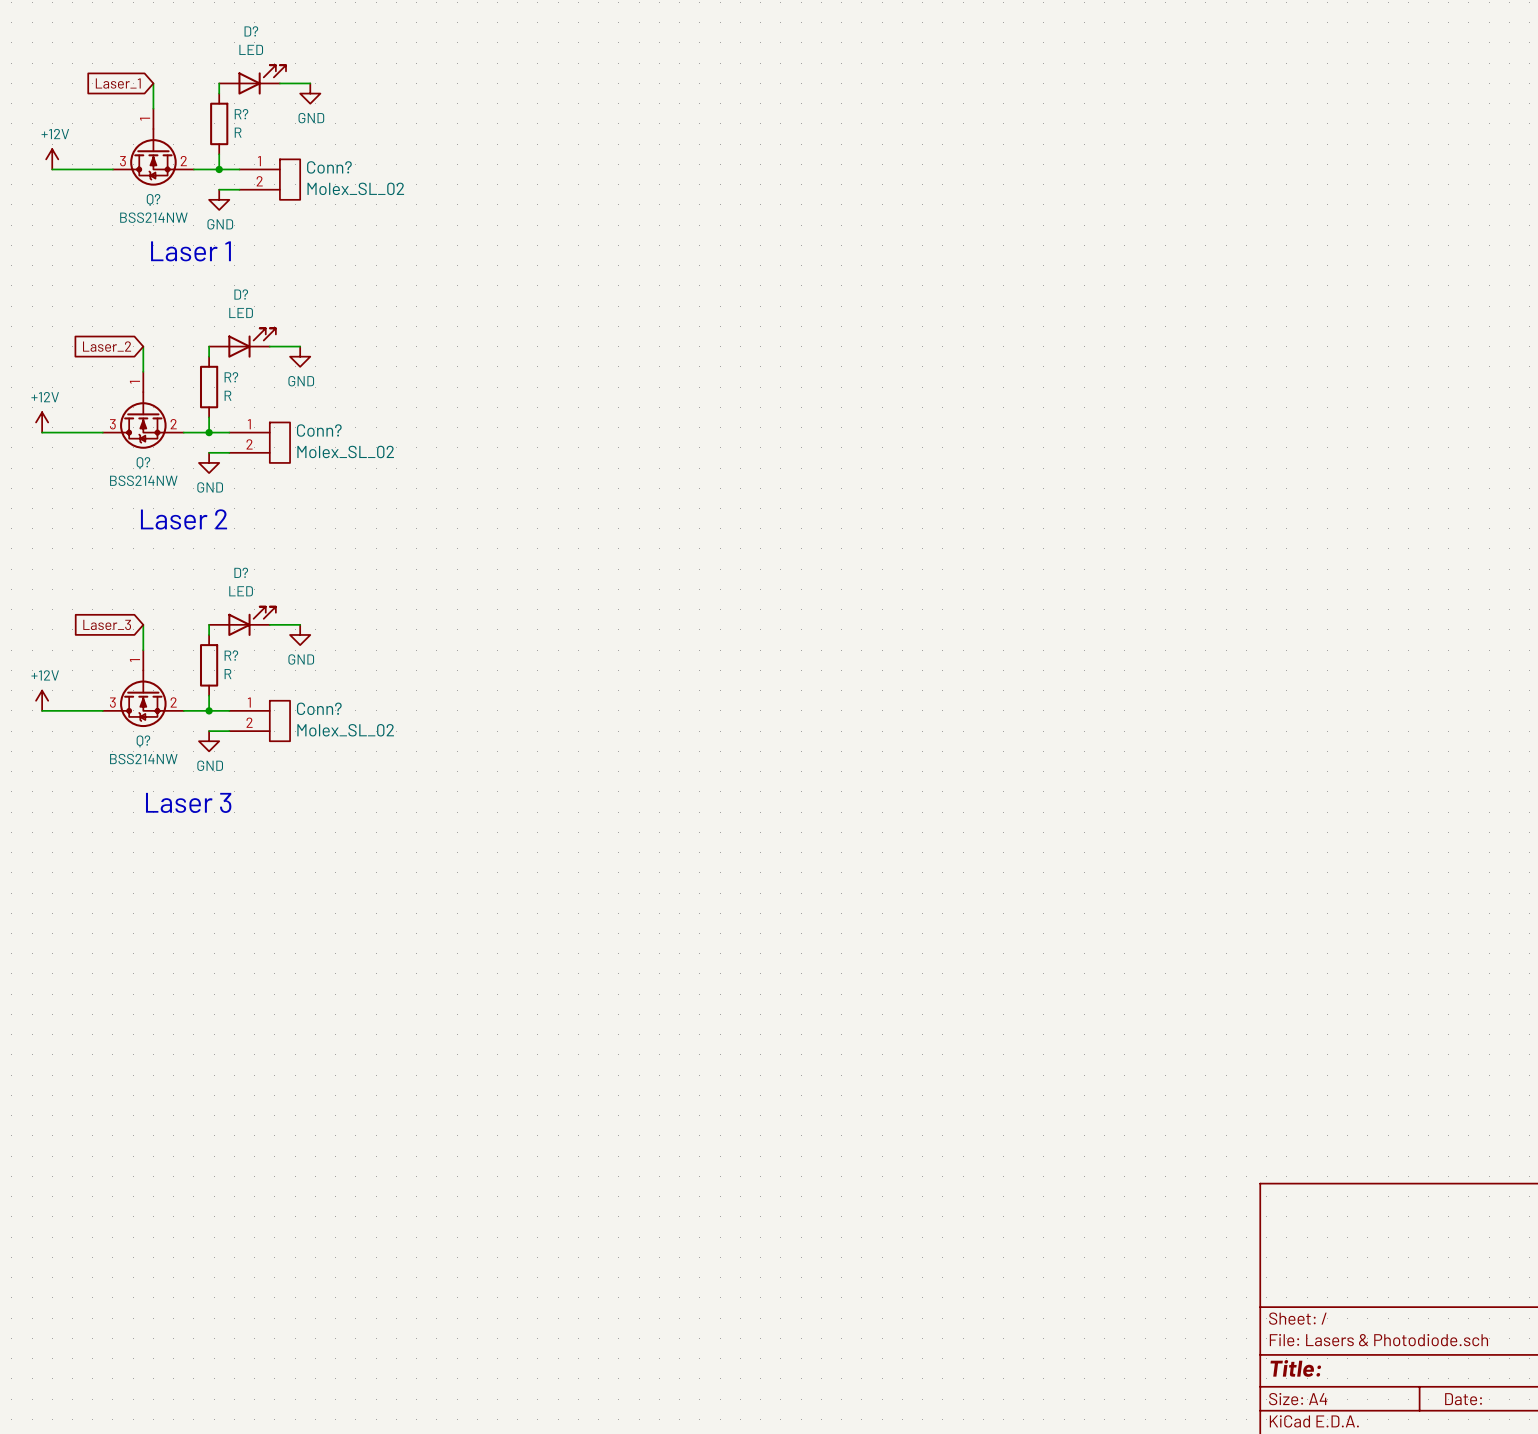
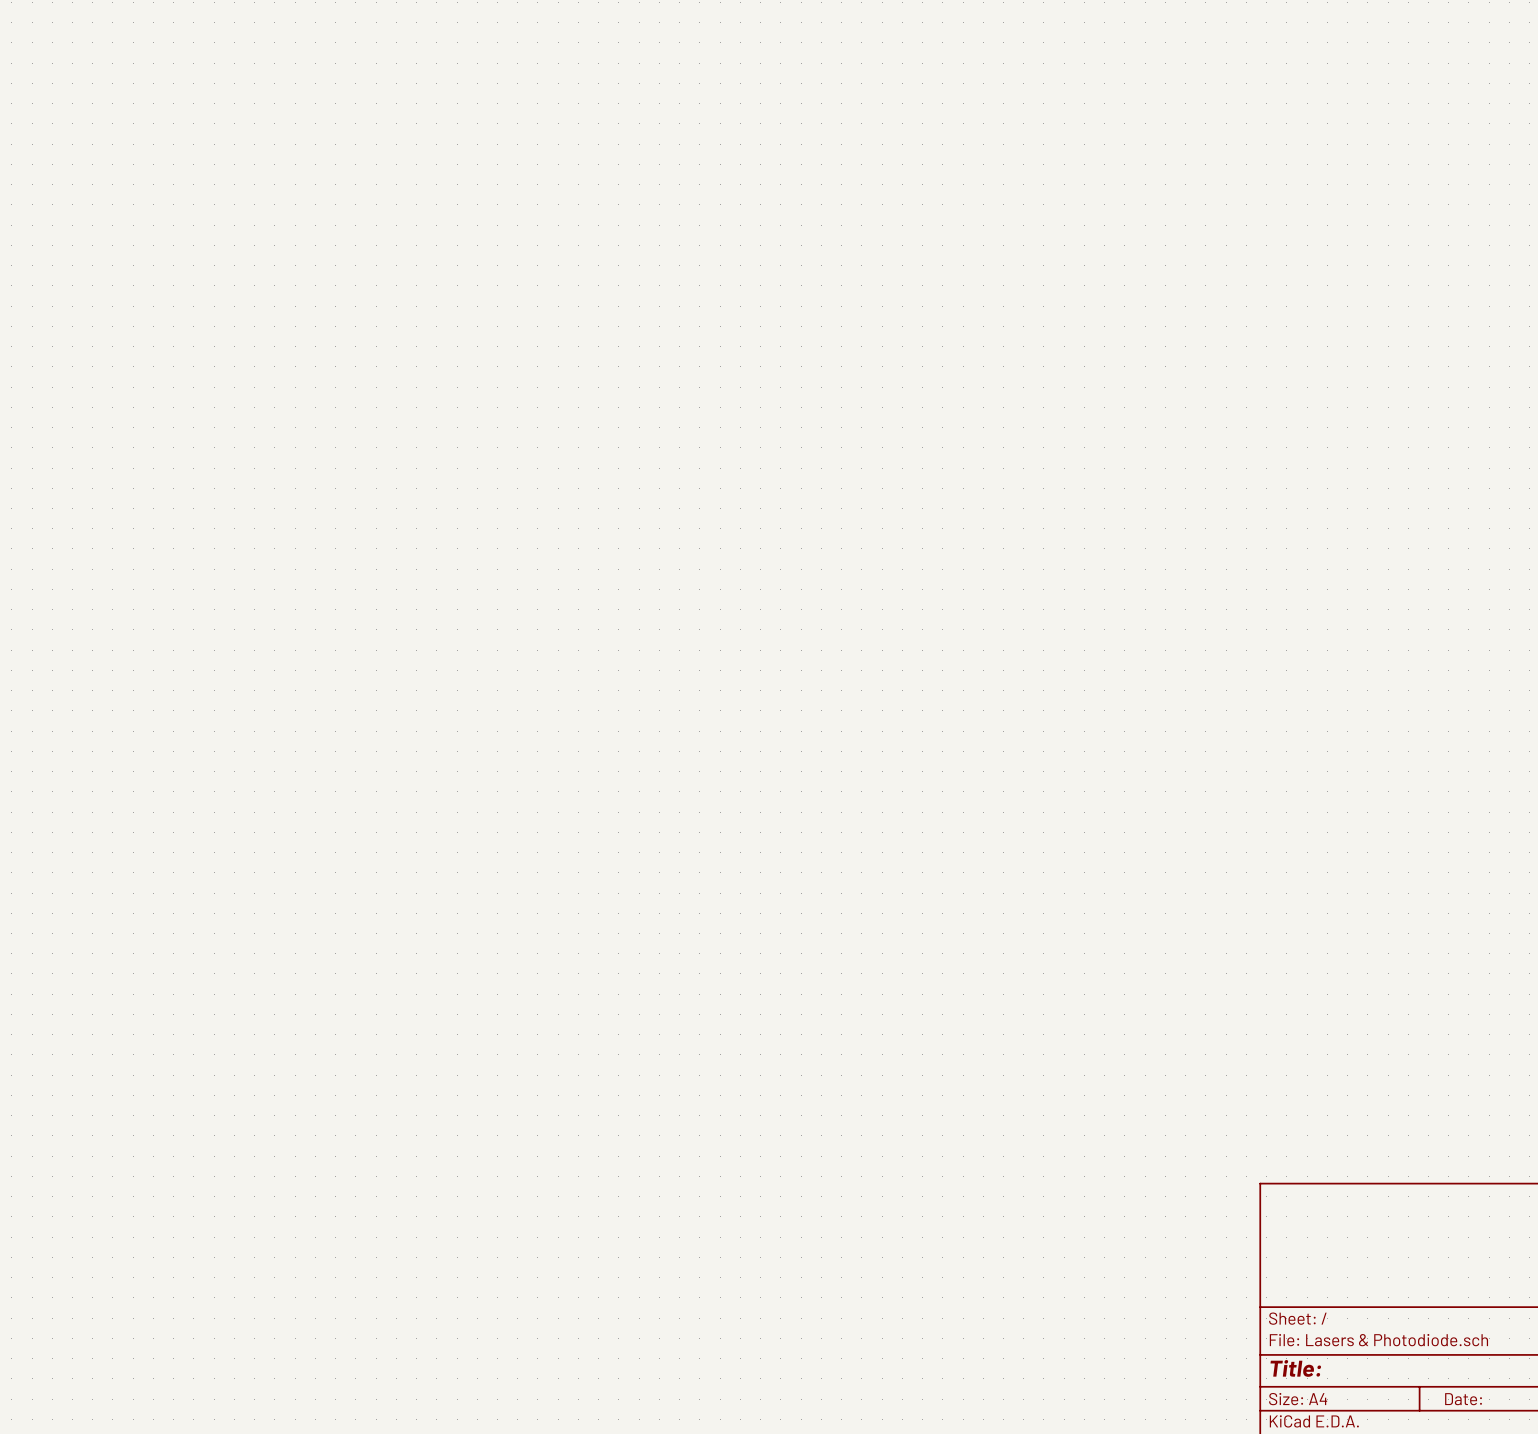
D?: LED (252, 79) -> none
global label: Laser_1 (118, 83) -> none
wire: (153, 83) (153, 108) -> none
wire: (219, 83) (219, 93) -> none
wire: (279, 83) (310, 83) -> none
power symbol: GND (310, 93) -> none
R?: R (219, 123) -> none
Q?: BSS214NW (153, 147) -> none
wire: (219, 154) (219, 169) -> none
power symbol: +12V (52, 159) -> none
wire: (52, 169) (112, 169) -> none
wire: (193, 169) (239, 169) -> none
junction: (219, 169) -> none
Conn?: Molex_SL_02 (269, 179) -> none
wire: (219, 189) (239, 189) -> none
power symbol: GND (219, 199) -> none
text: Laser 1 (190, 251) -> none
D?: LED (242, 343) -> none
global label: Laser_2 (107, 346) -> none
wire: (143, 346) (143, 371) -> none
wire: (209, 346) (209, 356) -> none
wire: (269, 346) (300, 346) -> none
power symbol: GND (300, 356) -> none
R?: R (209, 387) -> none
Q?: BSS214NW (143, 410) -> none
wire: (209, 417) (209, 432) -> none
power symbol: +12V (42, 422) -> none
wire: (42, 432) (102, 432) -> none
wire: (183, 432) (229, 432) -> none
junction: (209, 432) -> none
Conn?: Molex_SL_02 (259, 442) -> none
wire: (209, 452) (229, 452) -> none
power symbol: GND (209, 462) -> none
text: Laser 2 (184, 519) -> none
D?: LED (242, 621) -> none
global label: Laser_3 (107, 624) -> none
wire: (143, 624) (143, 650) -> none
wire: (209, 624) (209, 634) -> none
wire: (269, 624) (300, 624) -> none
power symbol: GND (300, 634) -> none
R?: R (209, 665) -> none
Q?: BSS214NW (143, 688) -> none
wire: (209, 695) (209, 710) -> none
power symbol: +12V (42, 700) -> none
wire: (42, 710) (102, 710) -> none
wire: (183, 710) (229, 710) -> none
junction: (209, 710) -> none
Conn?: Molex_SL_02 (259, 721) -> none
wire: (209, 731) (229, 731) -> none
power symbol: GND (209, 741) -> none
text: Laser 3 (188, 802) -> none

